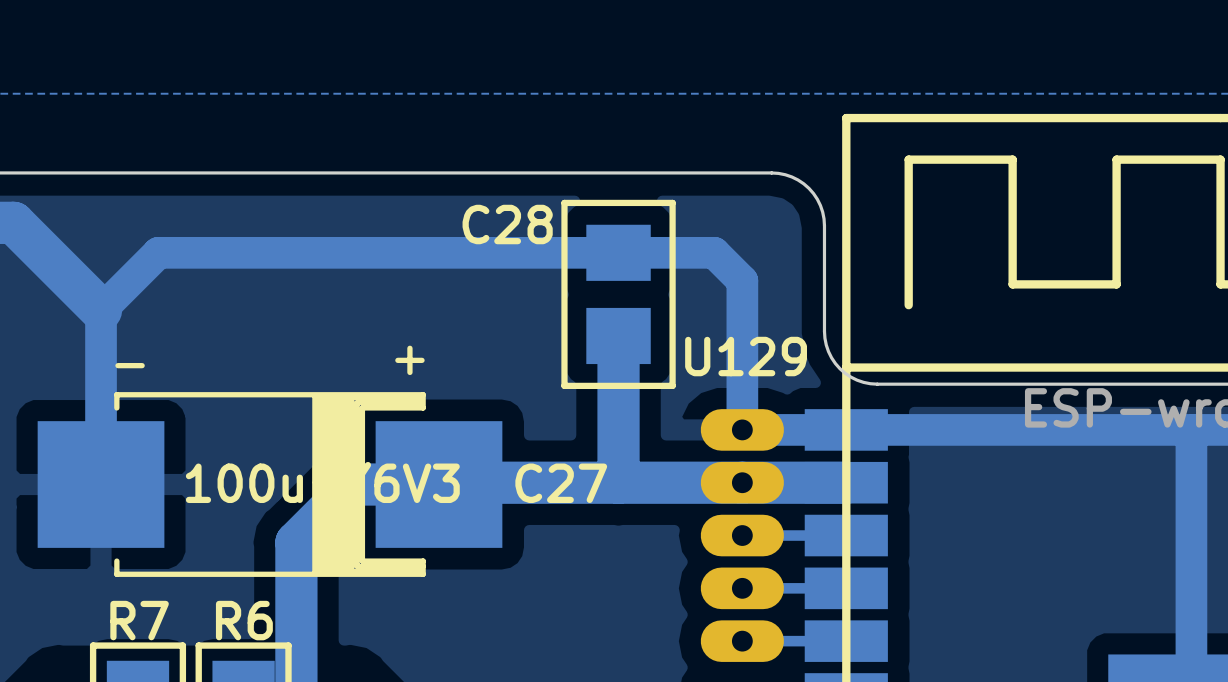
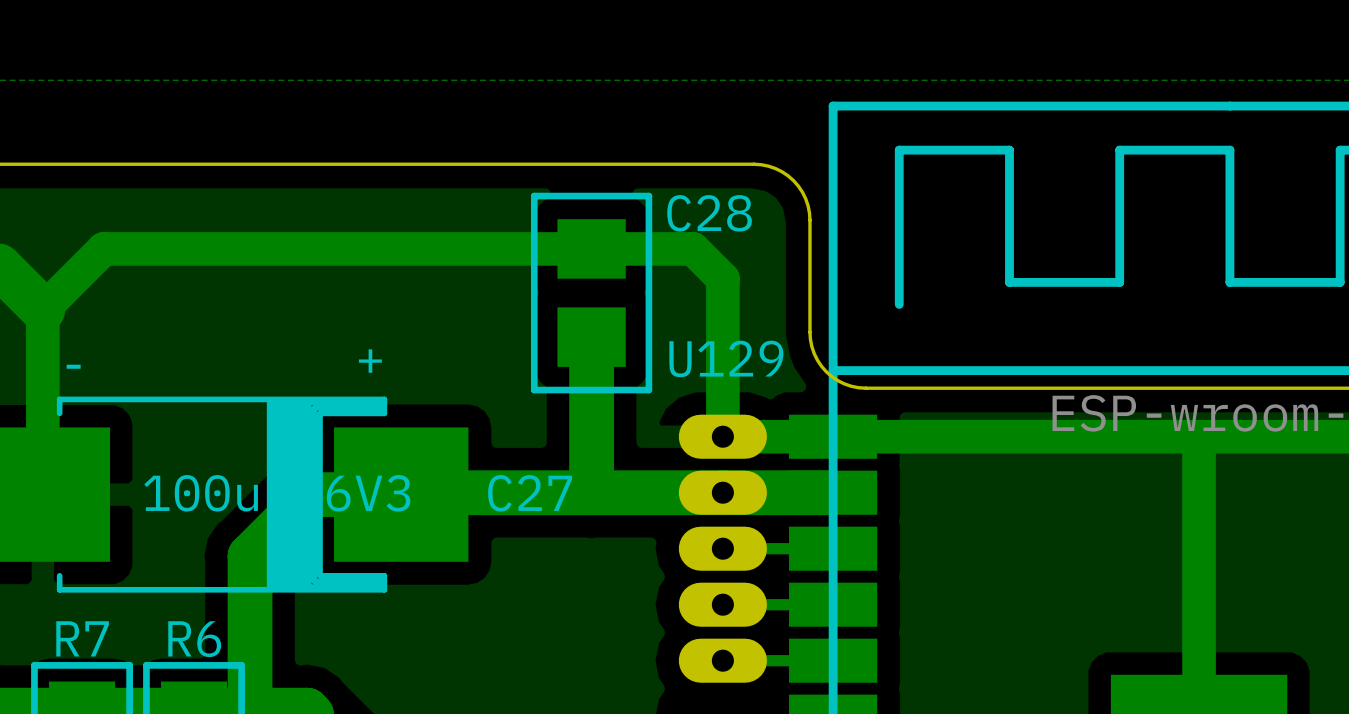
C28 name position: C28 (507, 224) -> C28 (709, 213)

